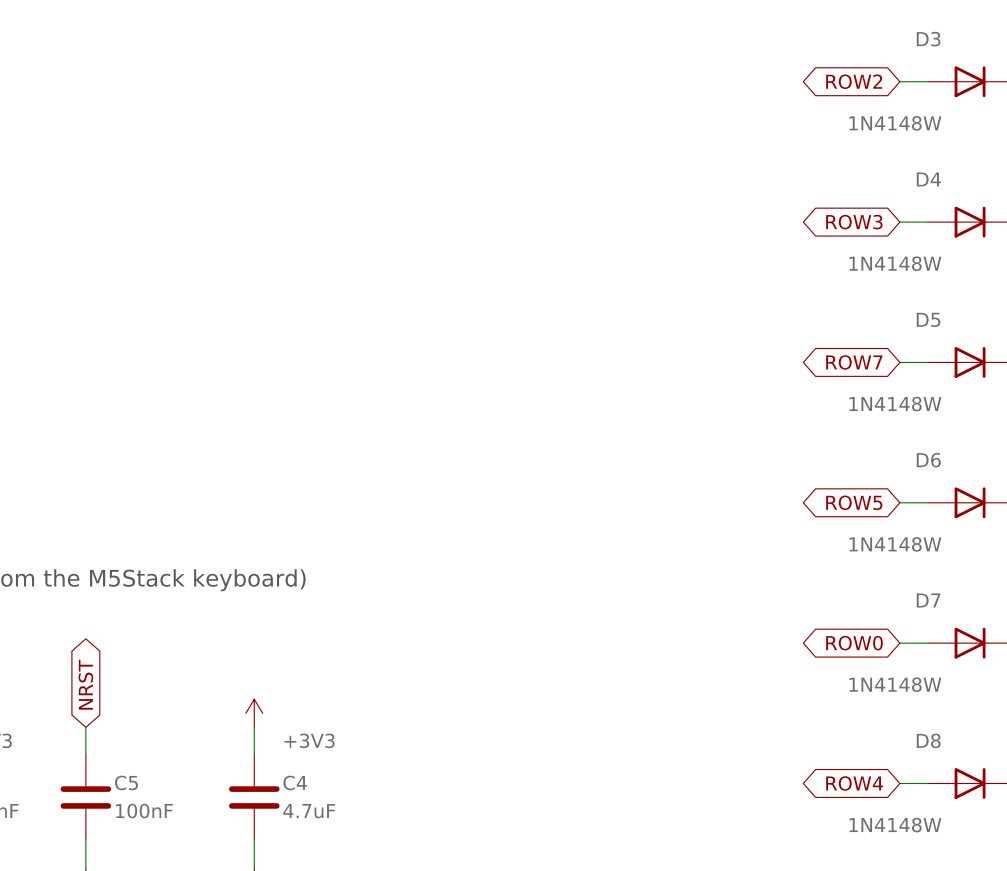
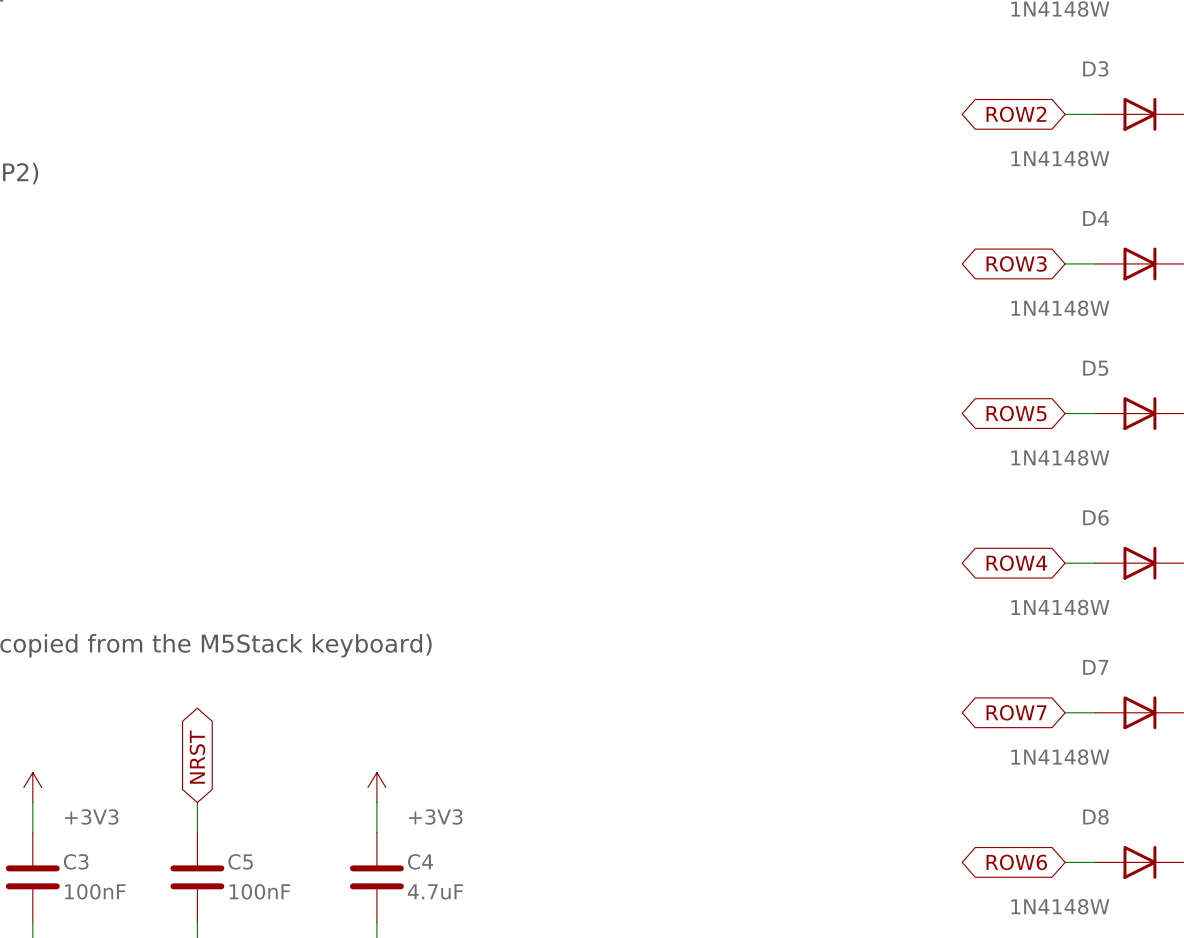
global label: ROW7 (854, 362) -> ROW5 (1016, 413)
global label: ROW5 (854, 502) -> ROW4 (1016, 563)
global label: ROW0 (854, 643) -> ROW7 (1016, 712)
global label: ROW4 (854, 783) -> ROW6 (1016, 862)

